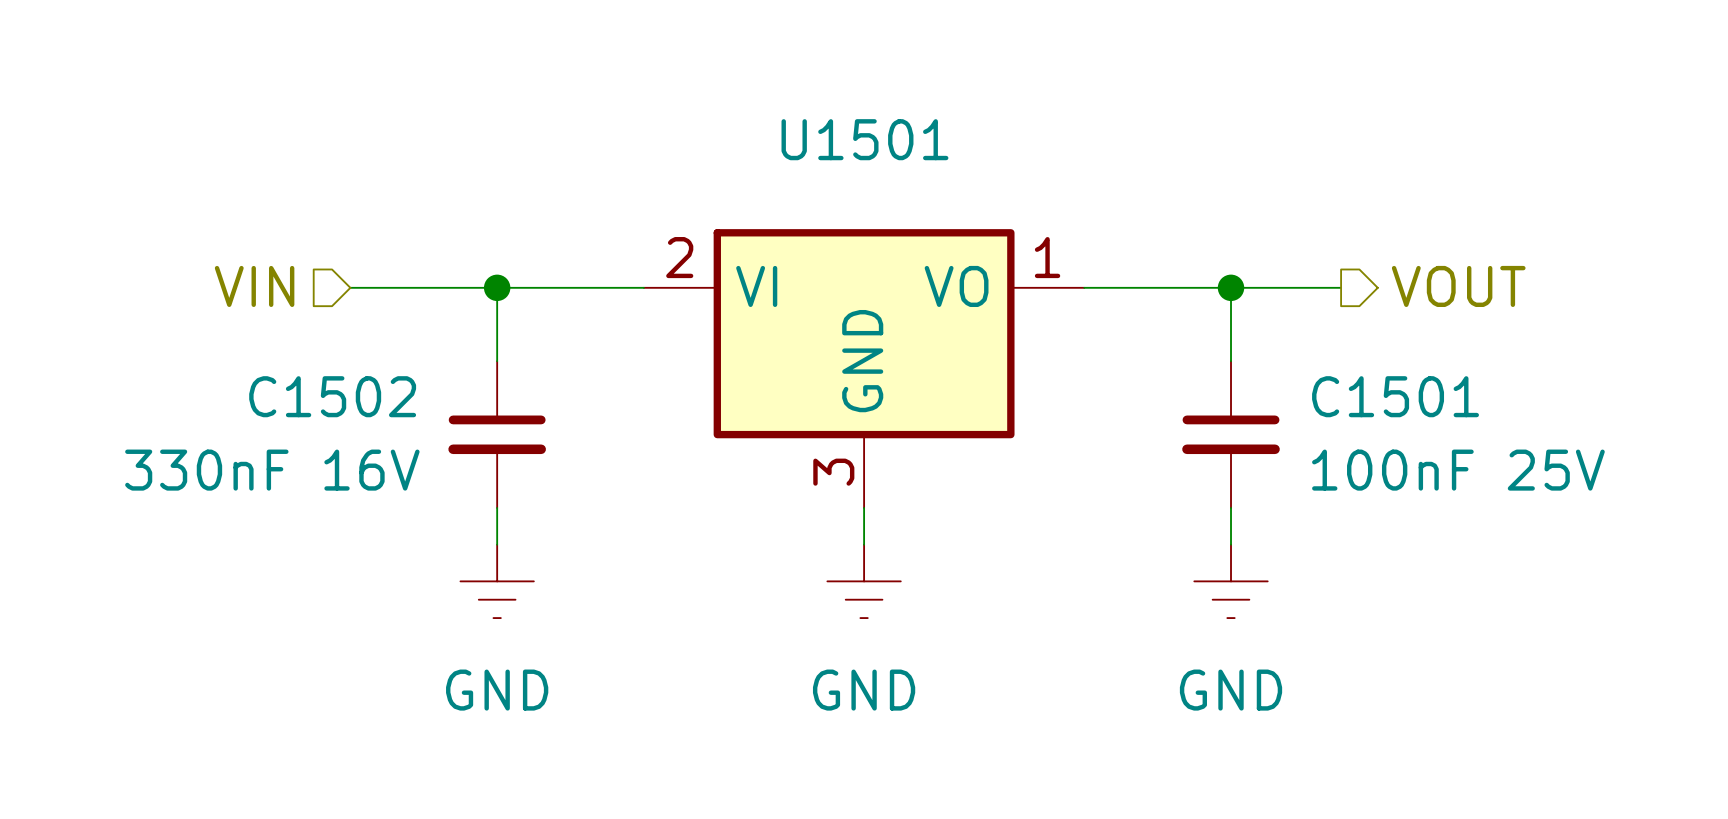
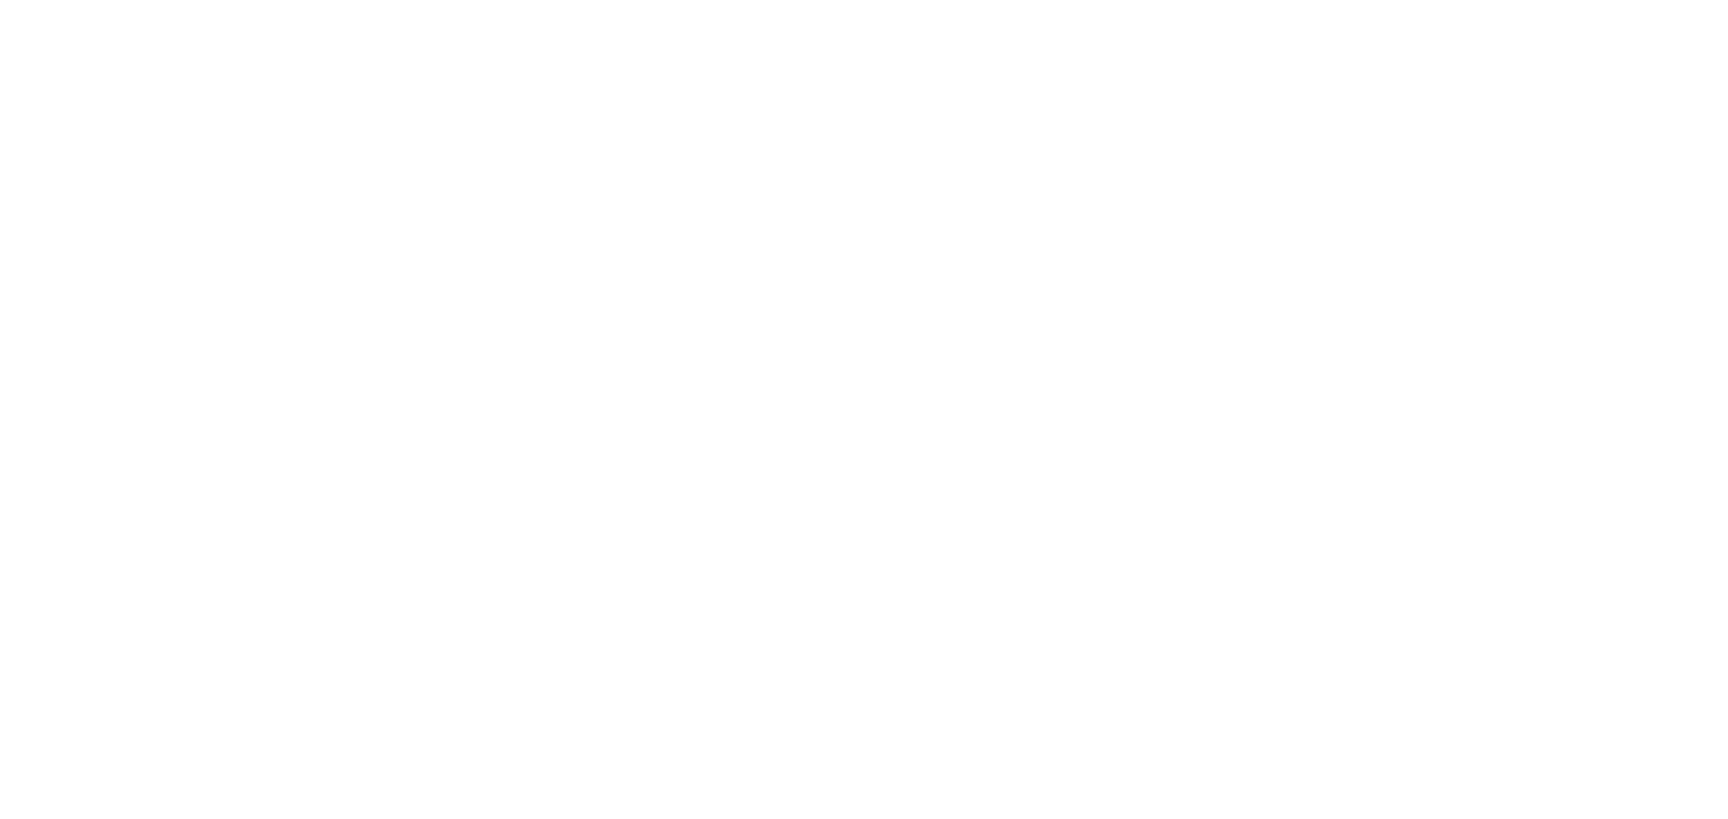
hierarchical label: VIN (254, 286) -> none
hierarchical label: VOUT (1458, 286) -> none
wire: (350, 287) (643, 287) -> none
wire: (497, 287) (497, 361) -> none
junction: (497, 287) -> none
wire: (1084, 287) (1341, 287) -> none
wire: (1231, 287) (1231, 361) -> none
junction: (1231, 287) -> none
U1501: (864, 368) -> none
C1502: 330nF 16V (497, 434) -> none
C1501: 100nF 25V (1231, 434) -> none
wire: (497, 507) (497, 544) -> none
wire: (864, 507) (864, 544) -> none
wire: (1231, 507) (1231, 544) -> none
power symbol: GND (497, 581) -> none
power symbol: GND (864, 581) -> none
power symbol: GND (1231, 581) -> none

